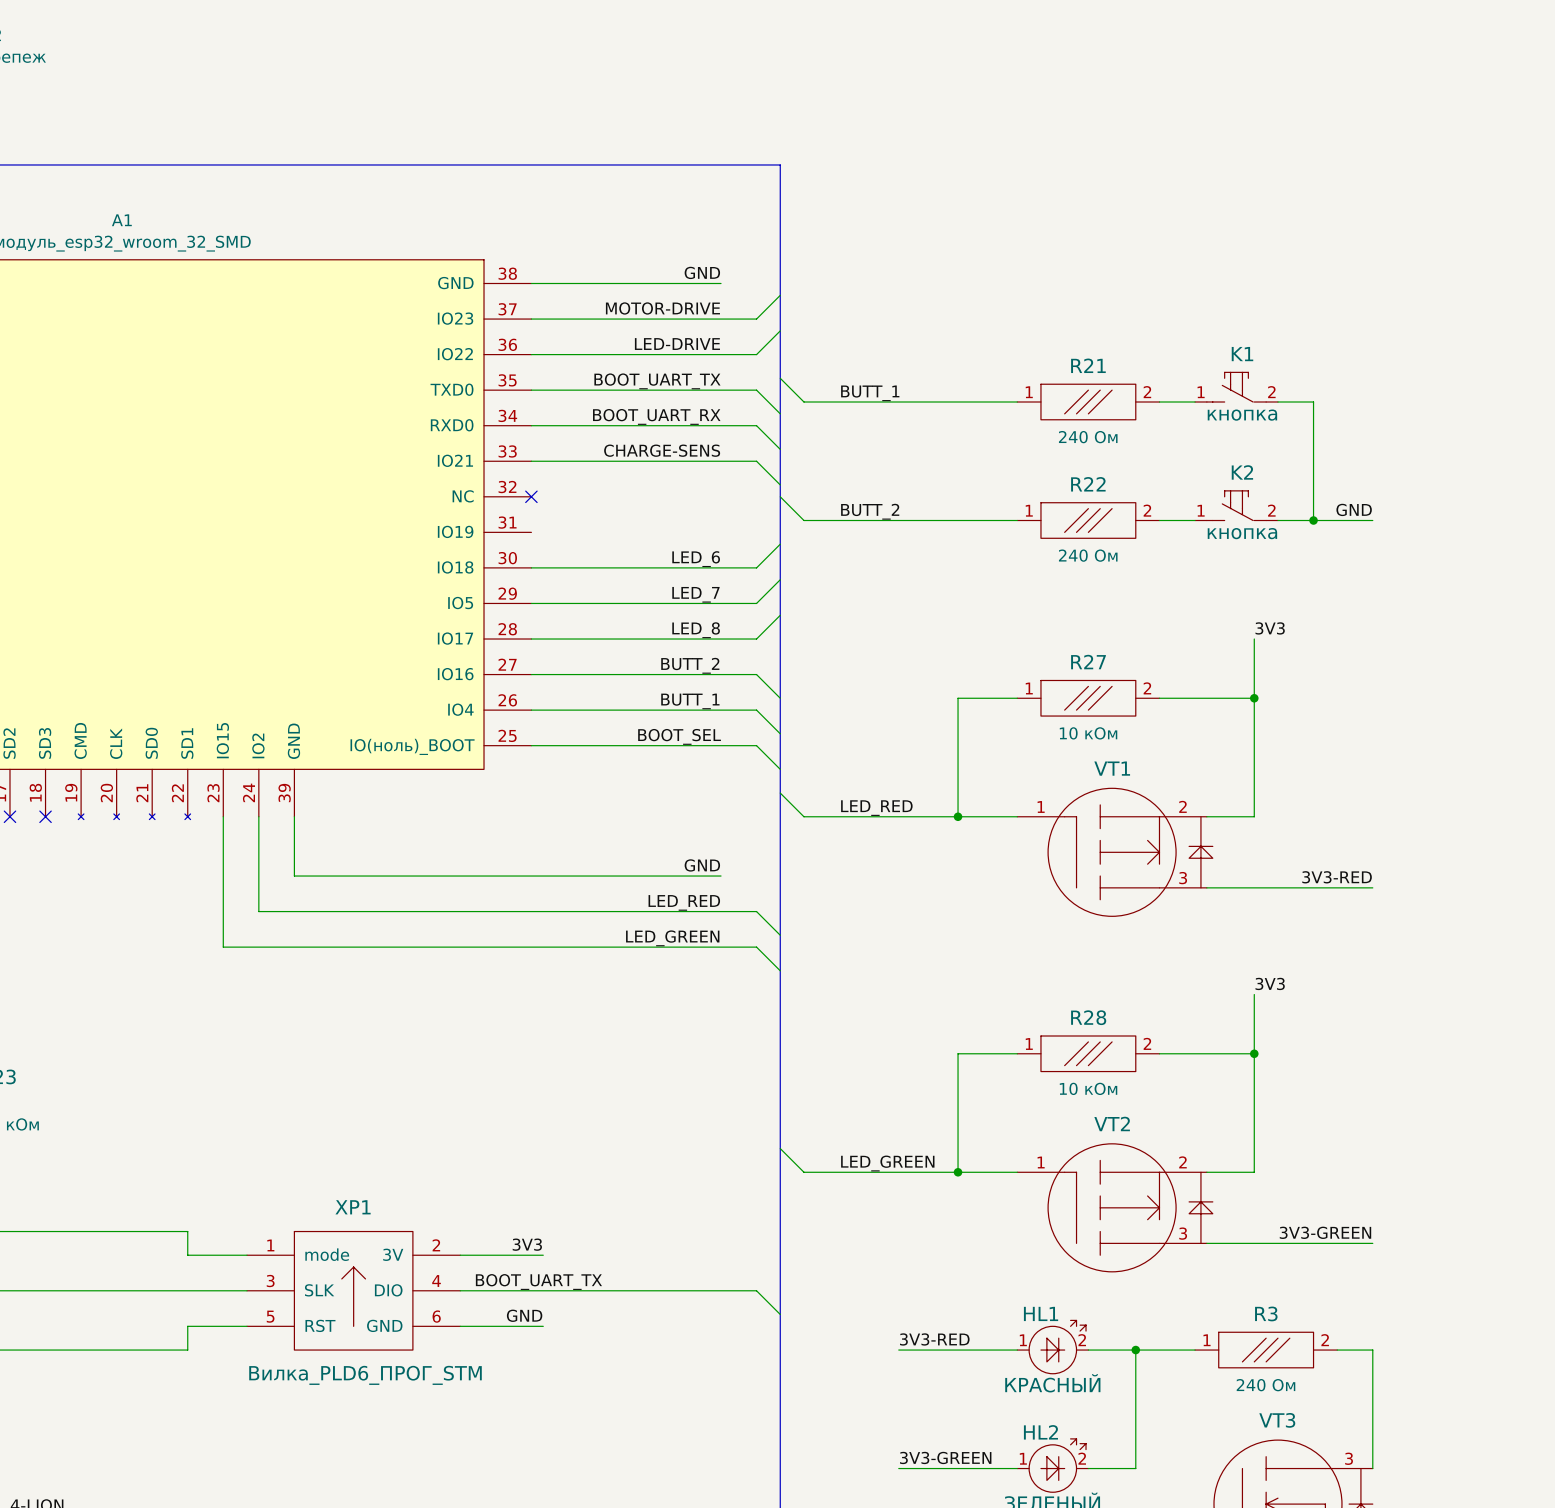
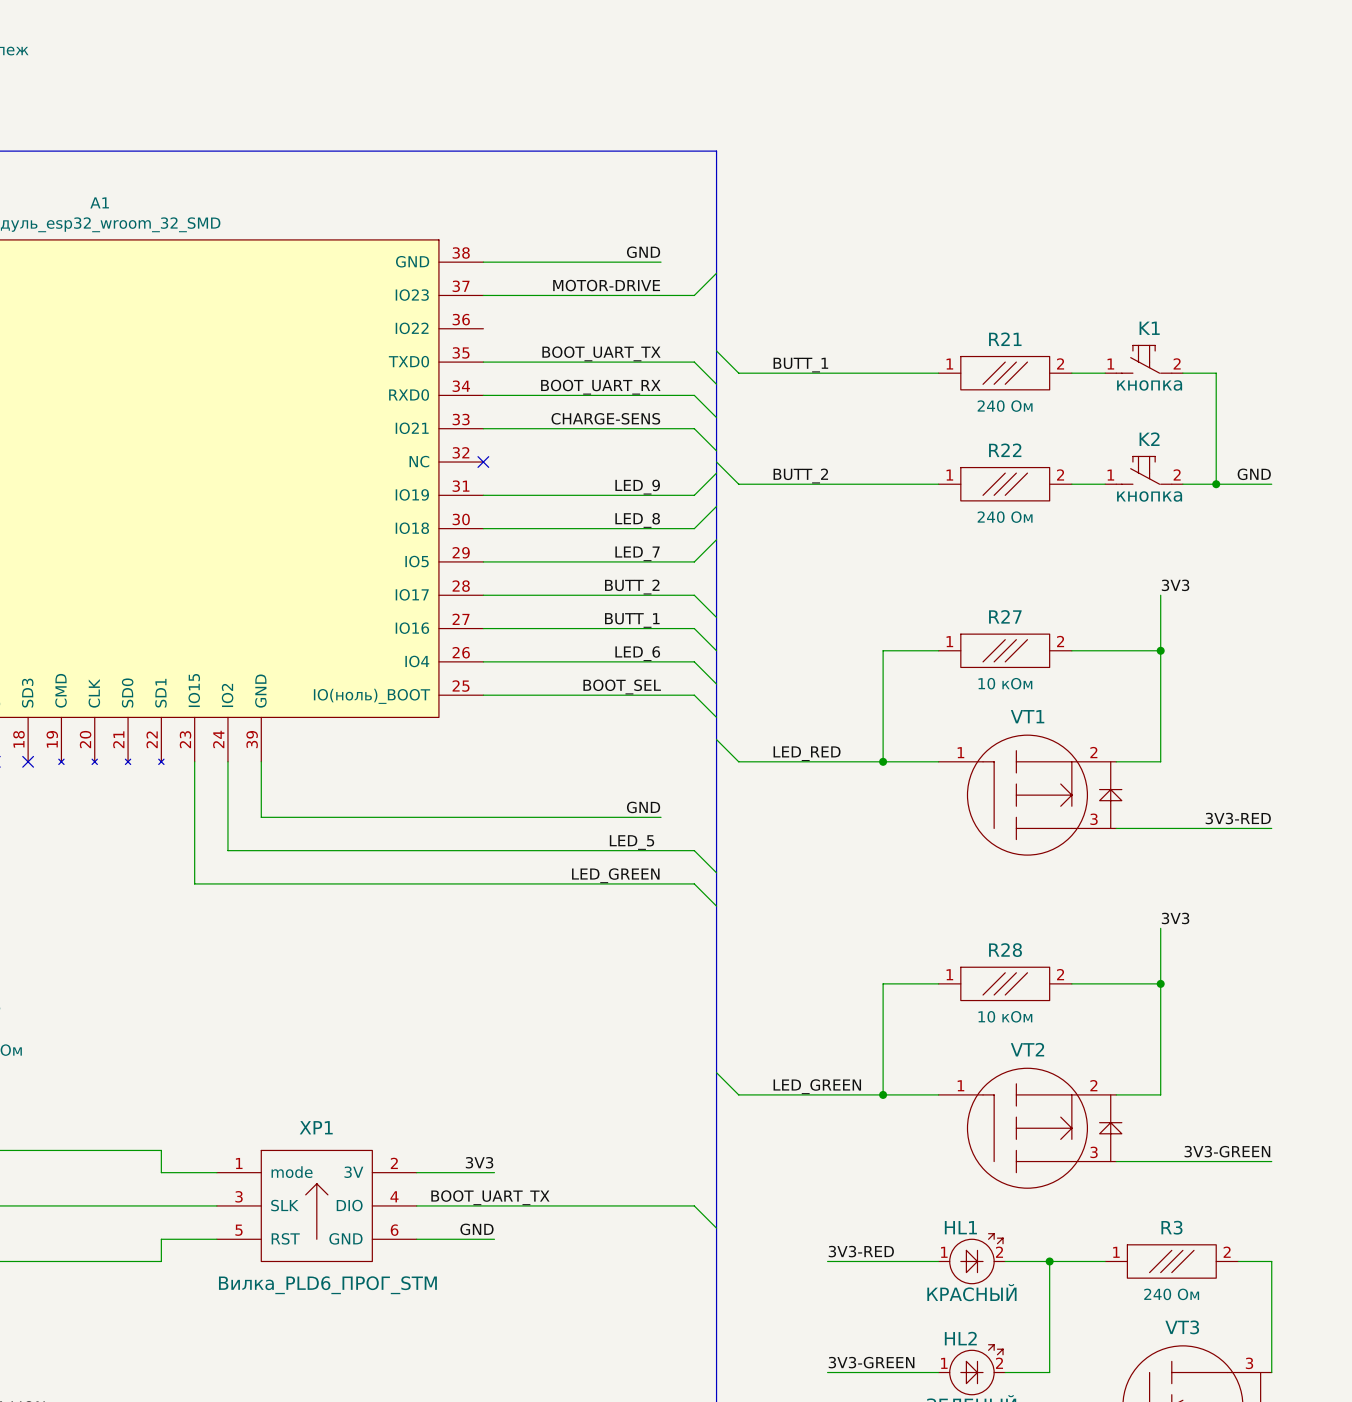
wire: (780, 330) (756, 354) (531, 354) -> (716, 473) (694, 495) (483, 495)
label: LED-DRIVE (677, 344) -> none
label: none -> LED_9 (637, 487)
label: LED_6 (696, 559) -> LED_8 (637, 520)
wire: (780, 615) (756, 639) -> (716, 617) (694, 595)
label: LED_8 (696, 630) -> BUTT_2 (632, 587)
label: BUTT_2 (690, 665) -> BUTT_1 (632, 620)
label: BUTT_1 (690, 701) -> LED_6 (637, 653)
label: LED_RED (684, 902) -> LED_5 (631, 842)

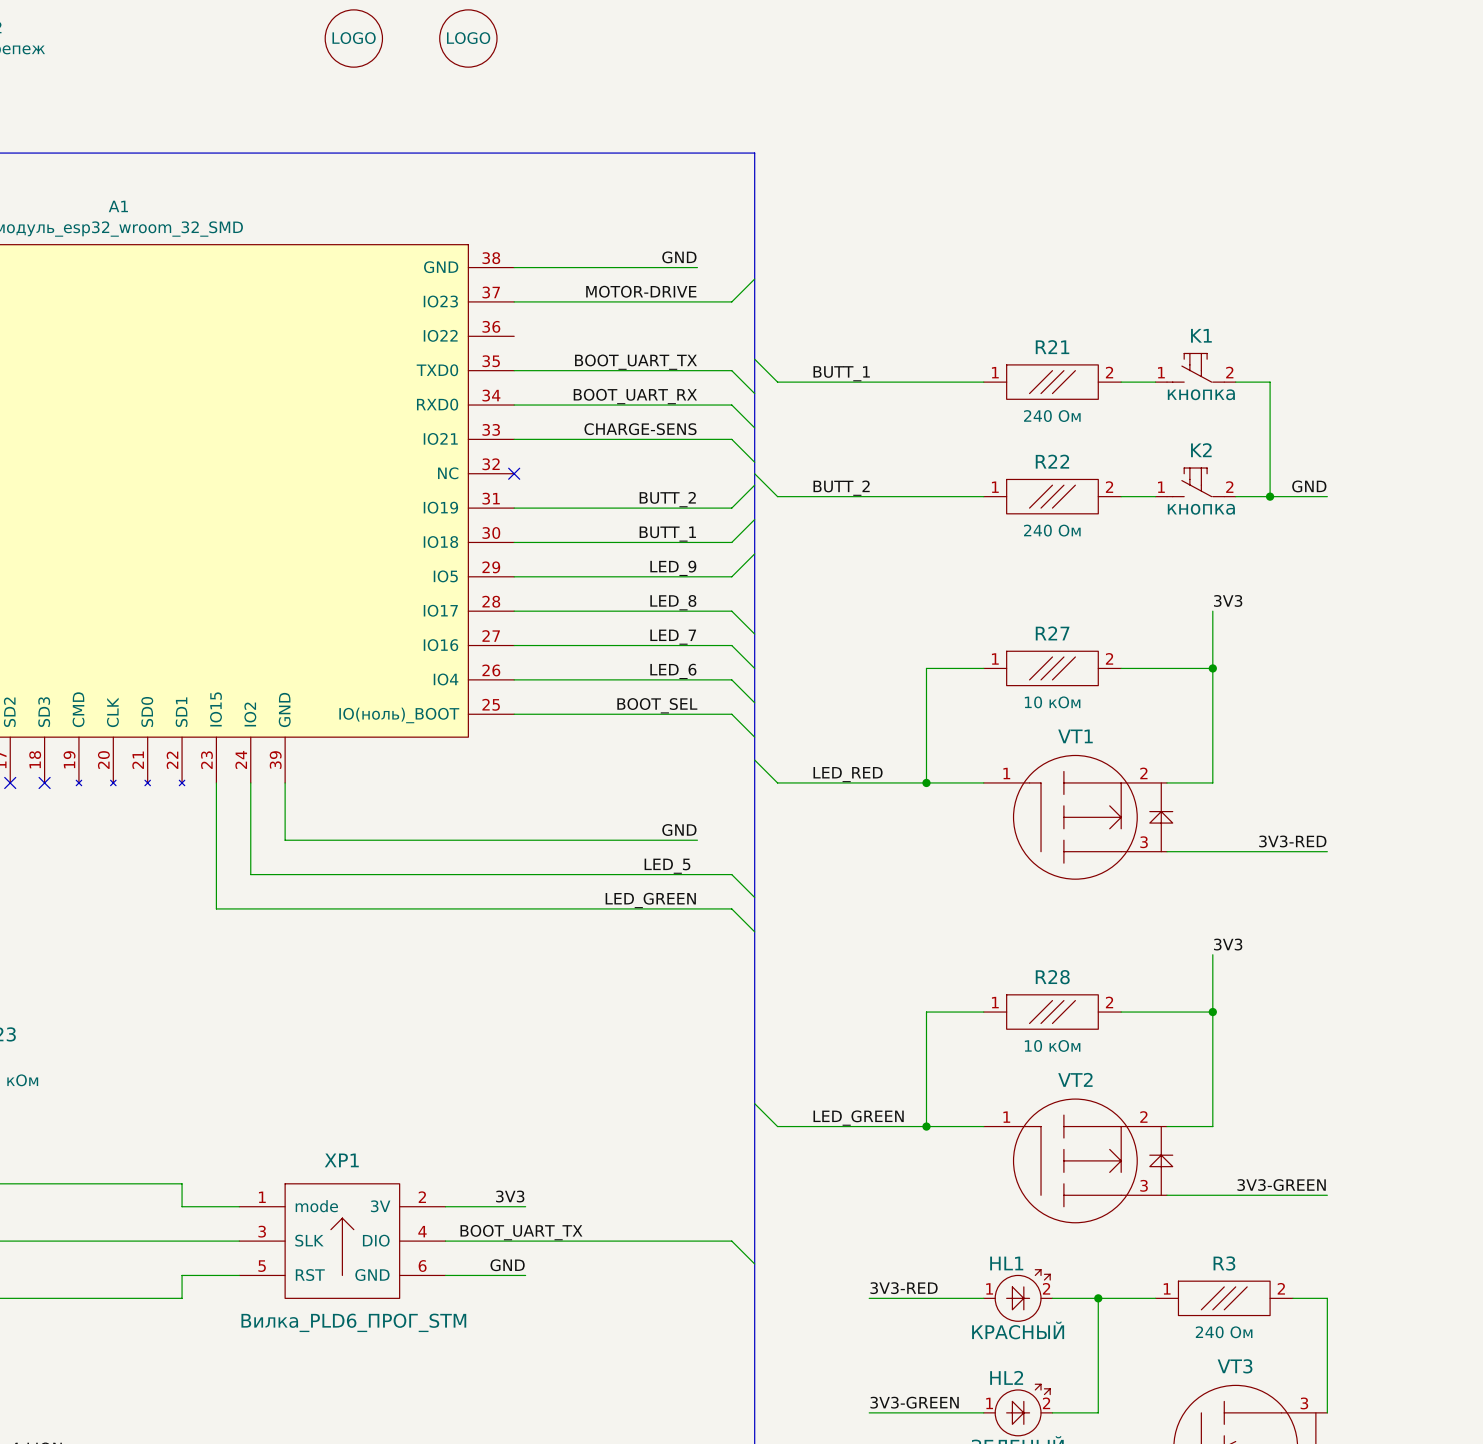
part: none -> LOGO (353, 38)
part: none -> LOGO (468, 38)
label: LED_9 (637, 487) -> BUTT_2 (667, 499)
label: LED_8 (637, 520) -> BUTT_1 (667, 534)
label: LED_7 (637, 553) -> LED_9 (673, 568)
label: BUTT_2 (632, 587) -> LED_8 (673, 602)
label: BUTT_1 (632, 620) -> LED_7 (673, 637)

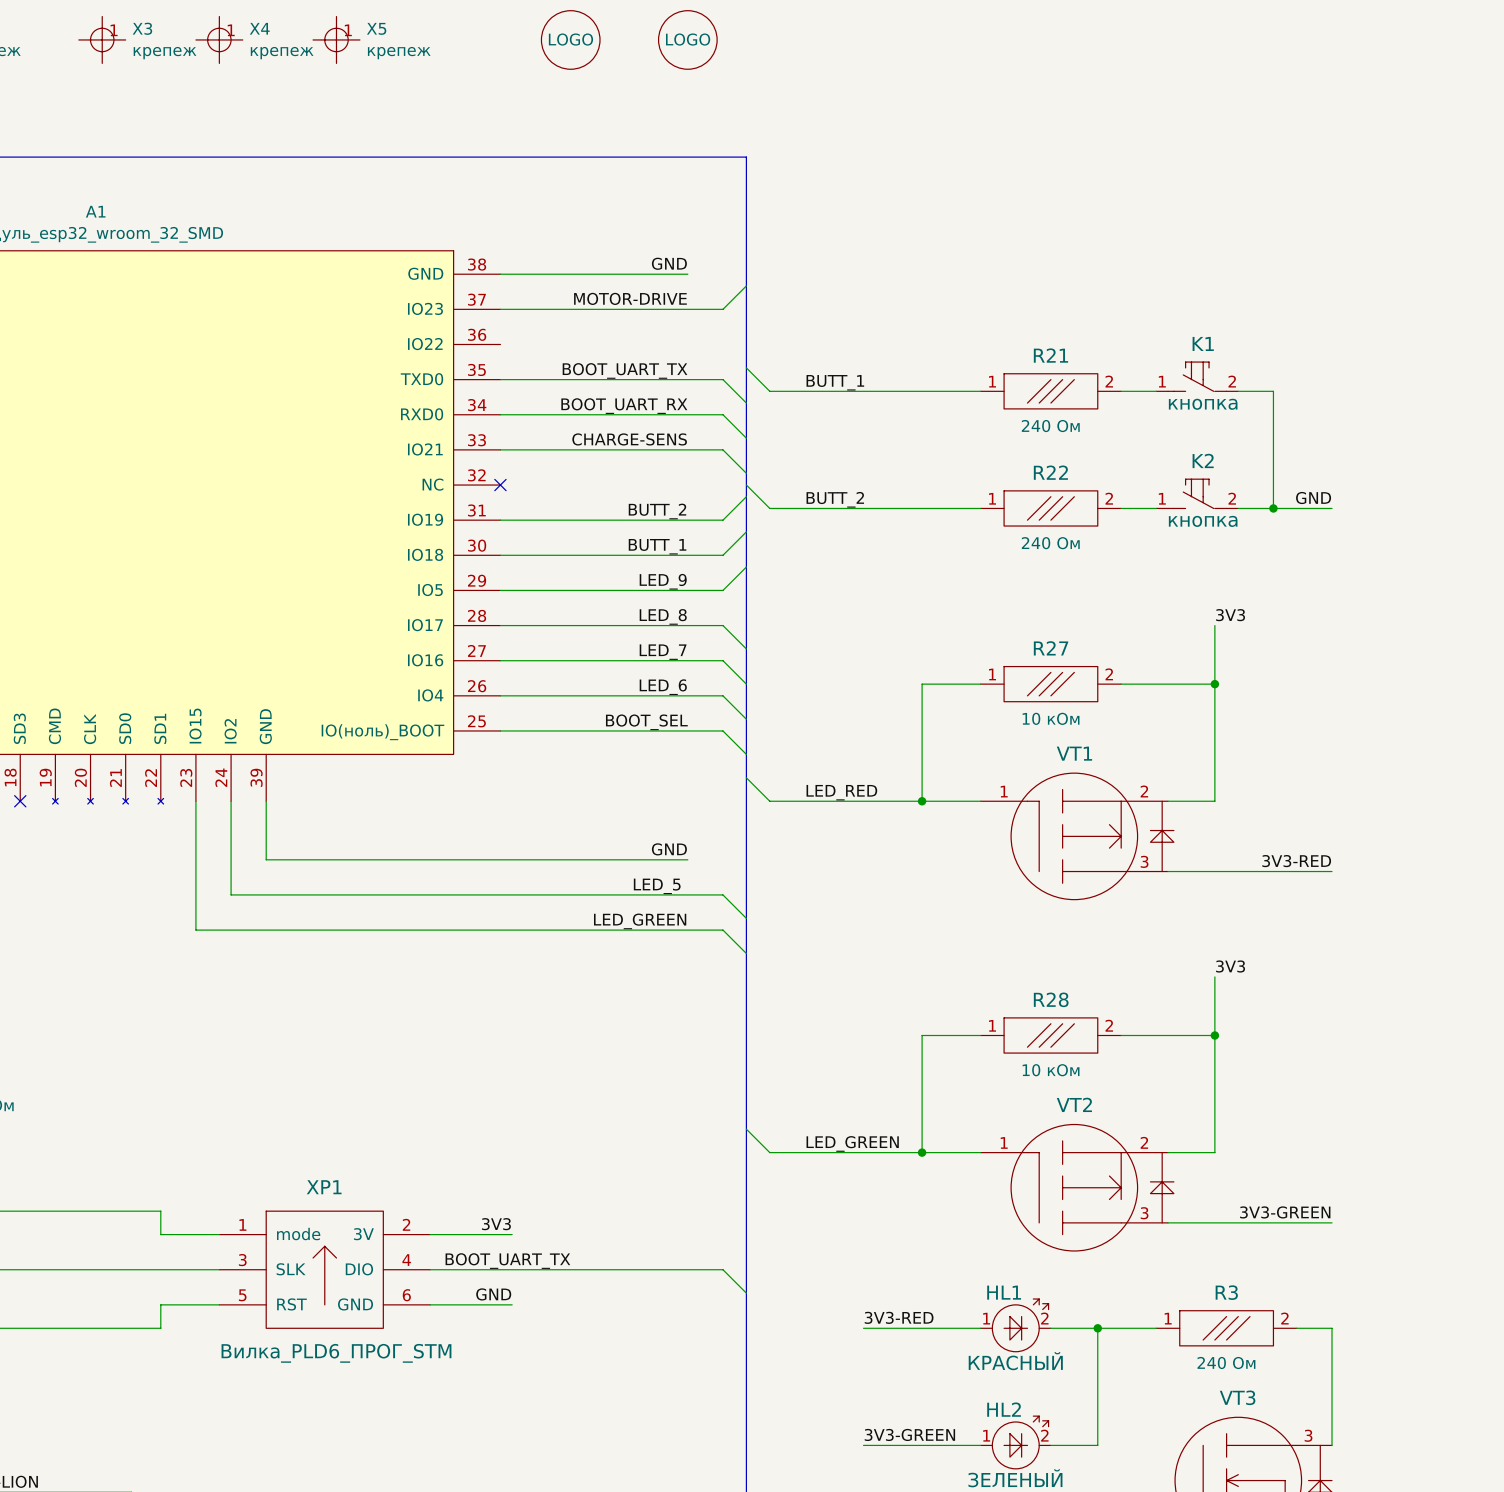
X3: none -> крепеж (102, 39)
X4: none -> крепеж (219, 39)
part: LOGO (353, 38) -> none
X5: none -> крепеж (336, 39)
part: LOGO (468, 38) -> none
part: none -> LOGO (570, 39)
part: none -> LOGO (687, 39)

